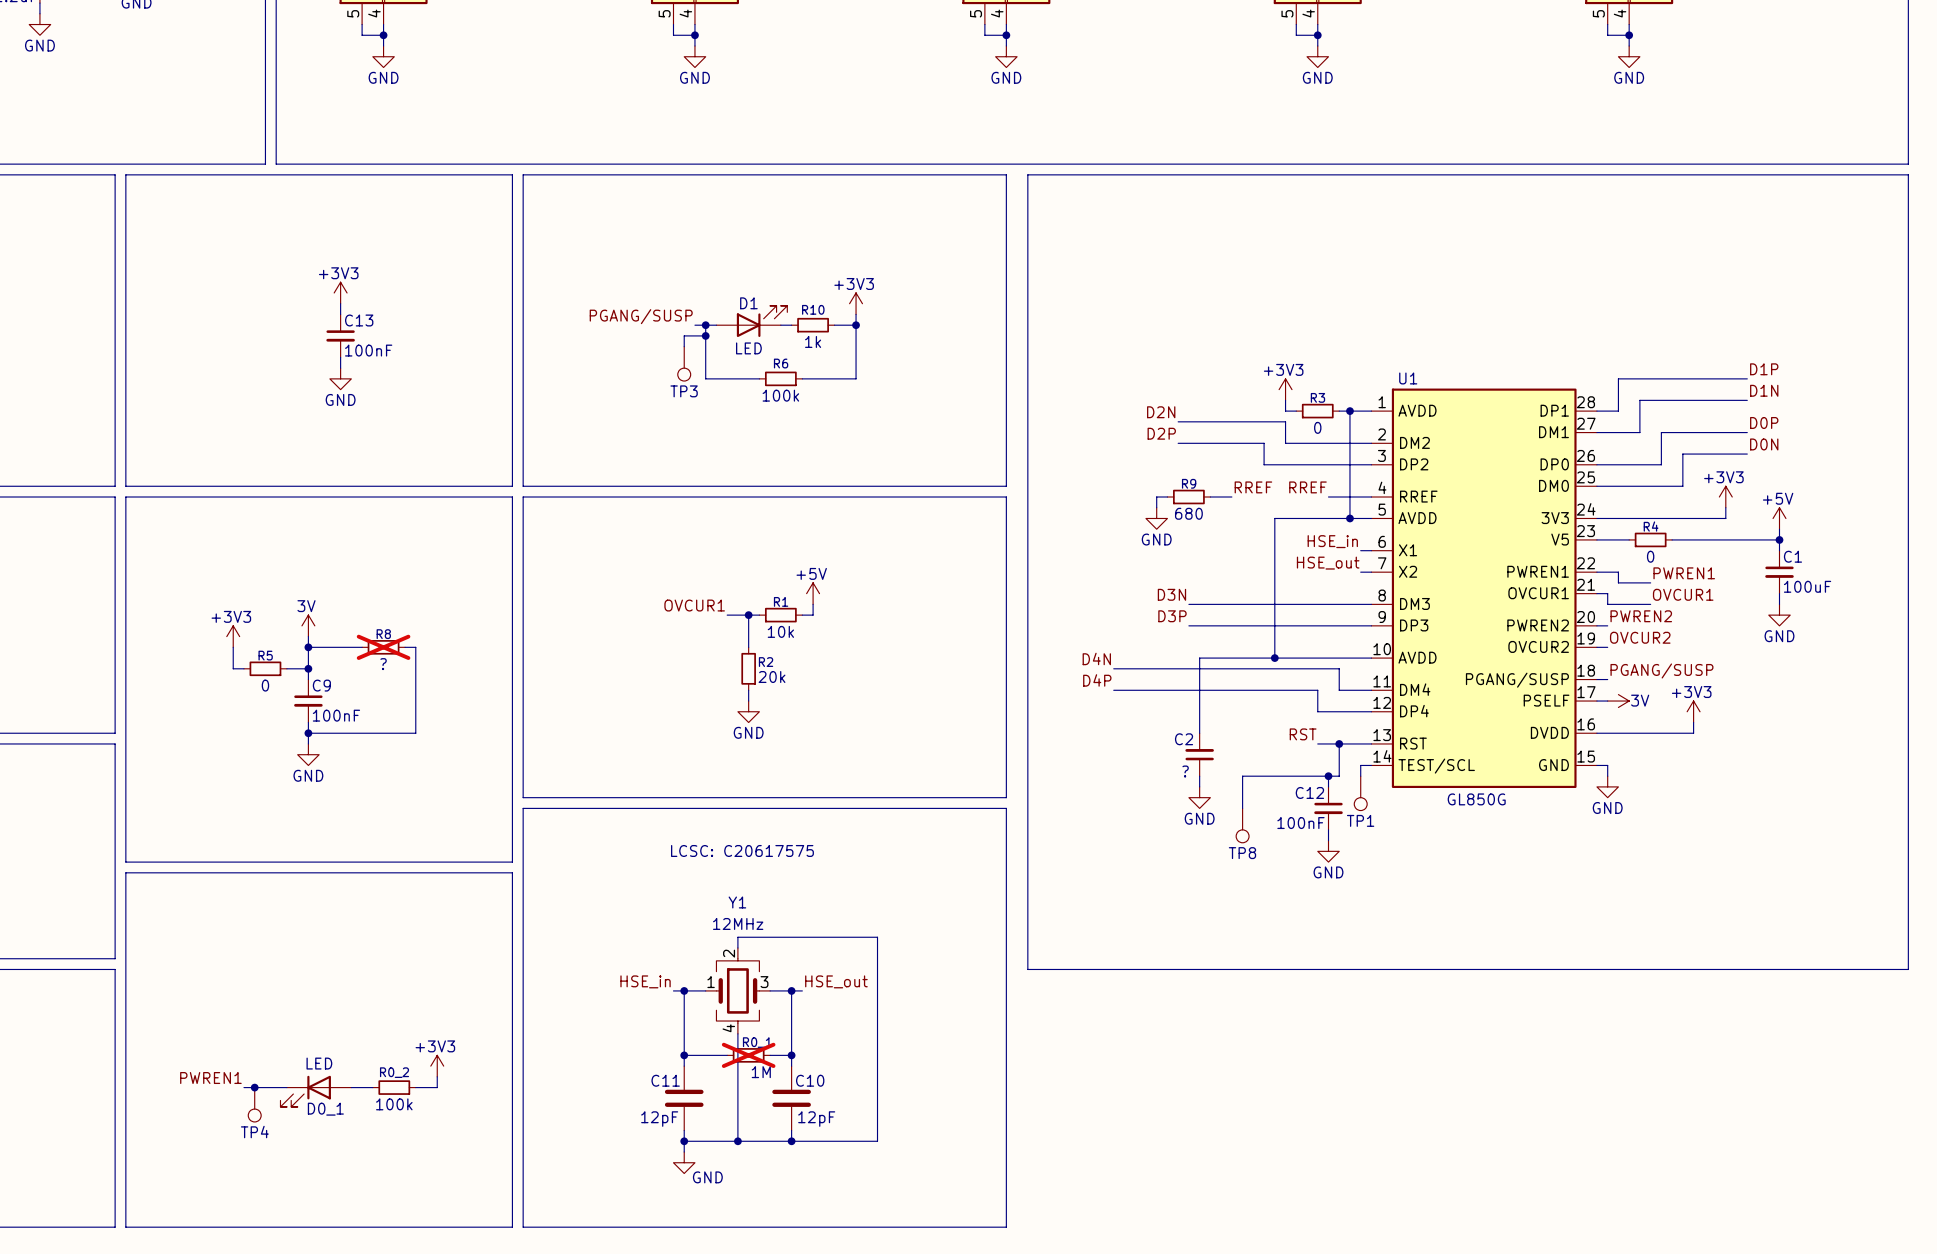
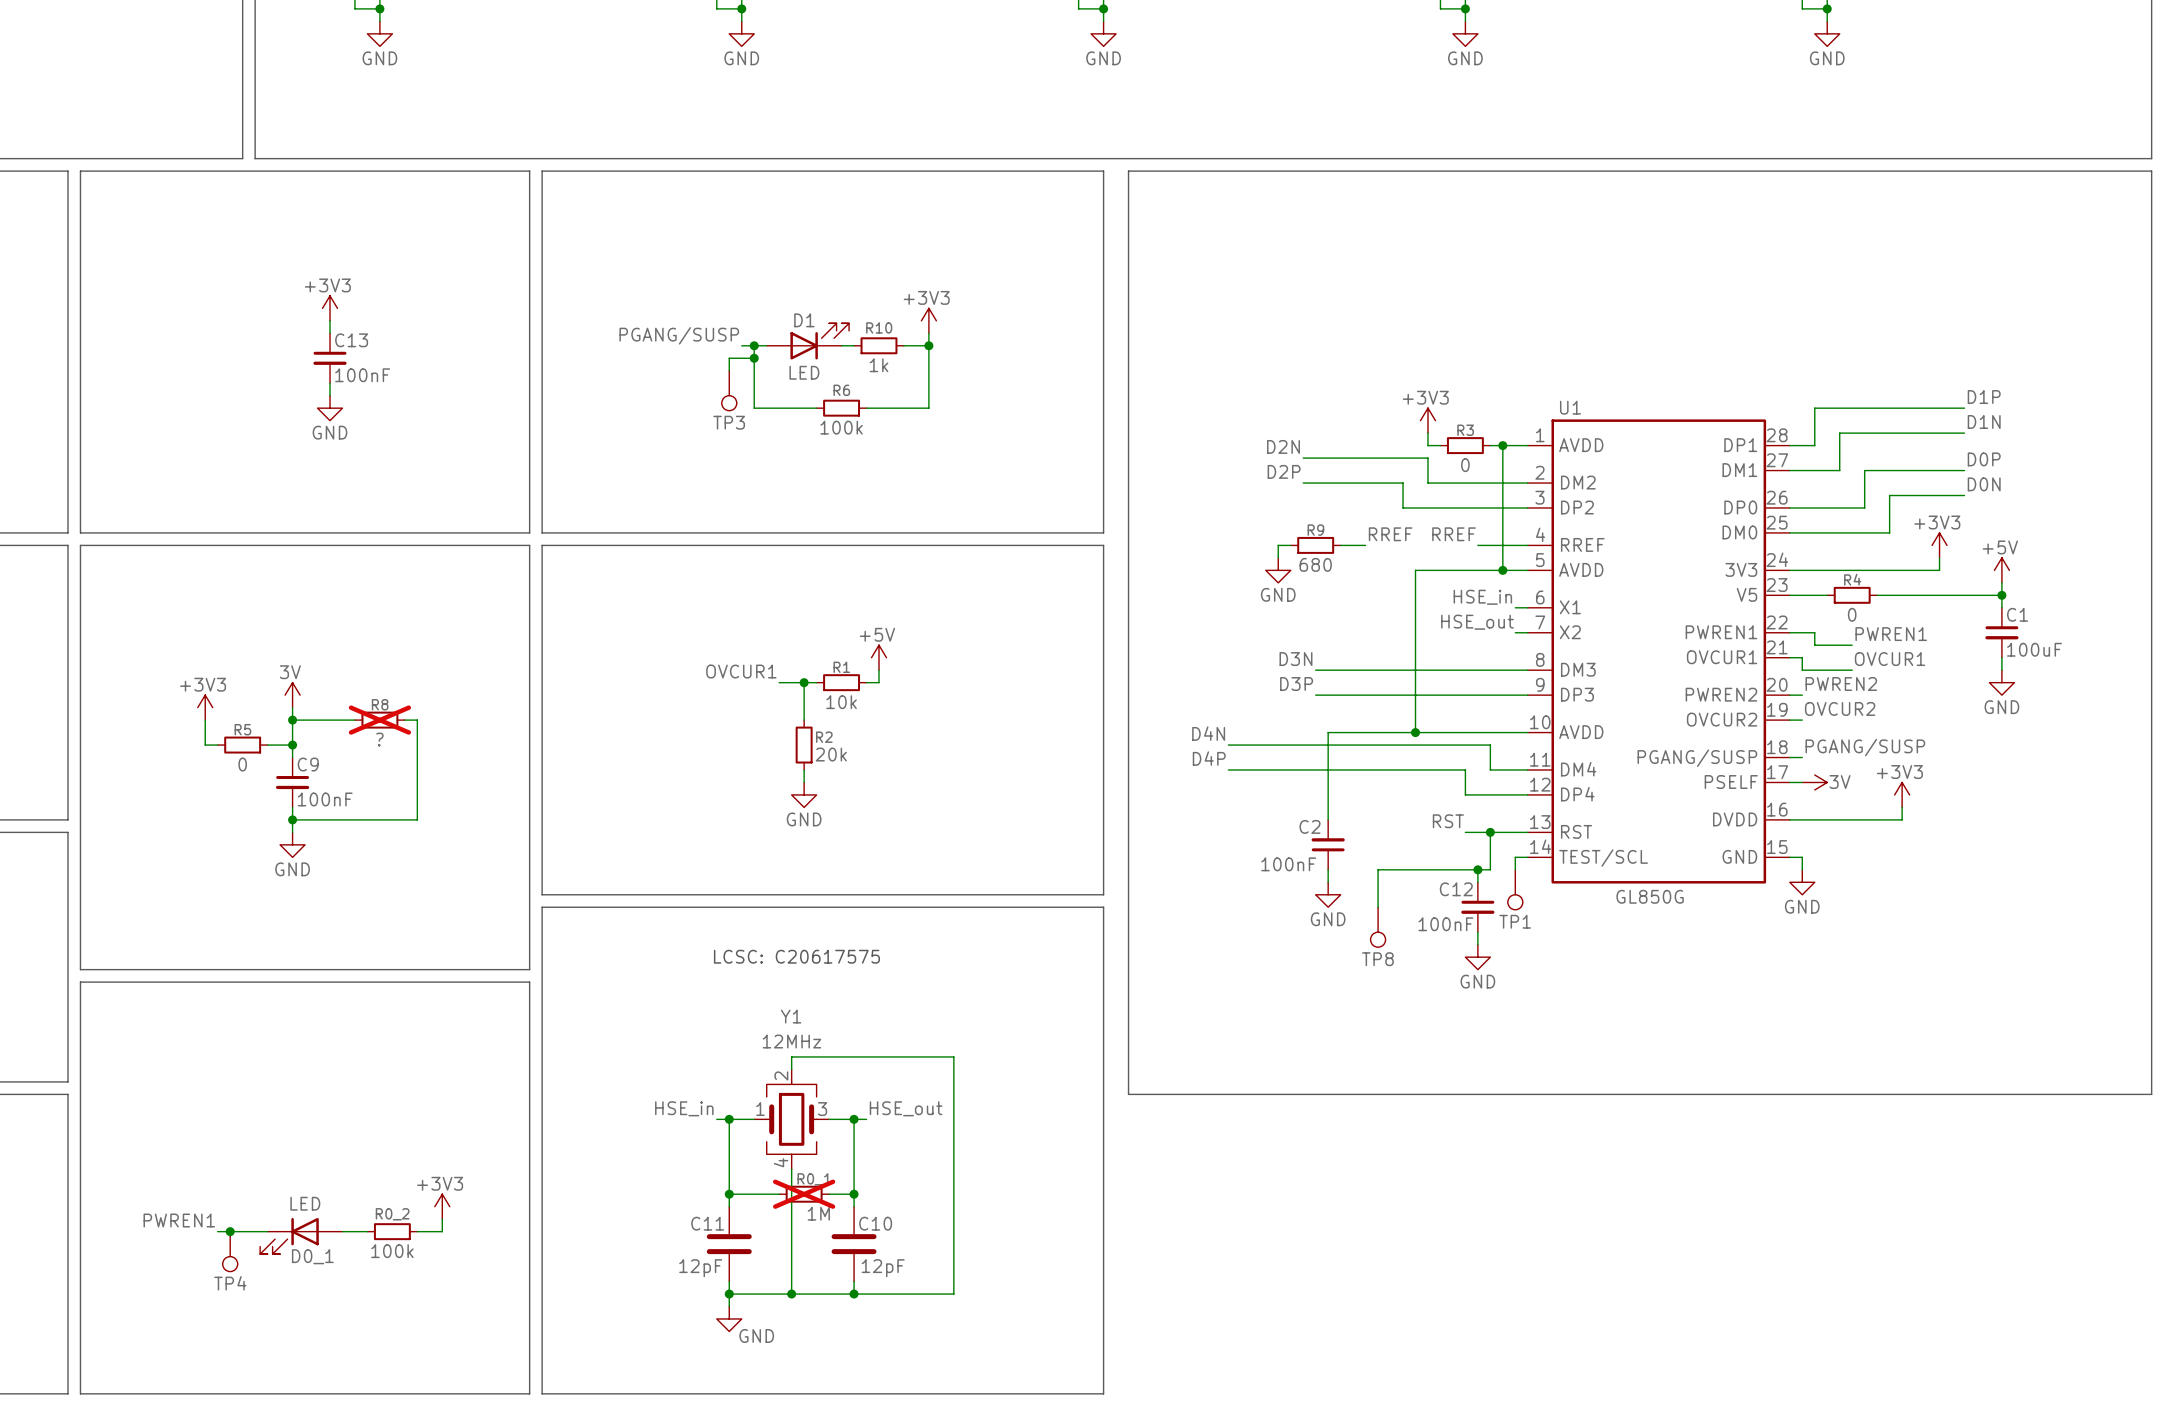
C2 value: ? (1185, 771) -> 100nF (1288, 864)

